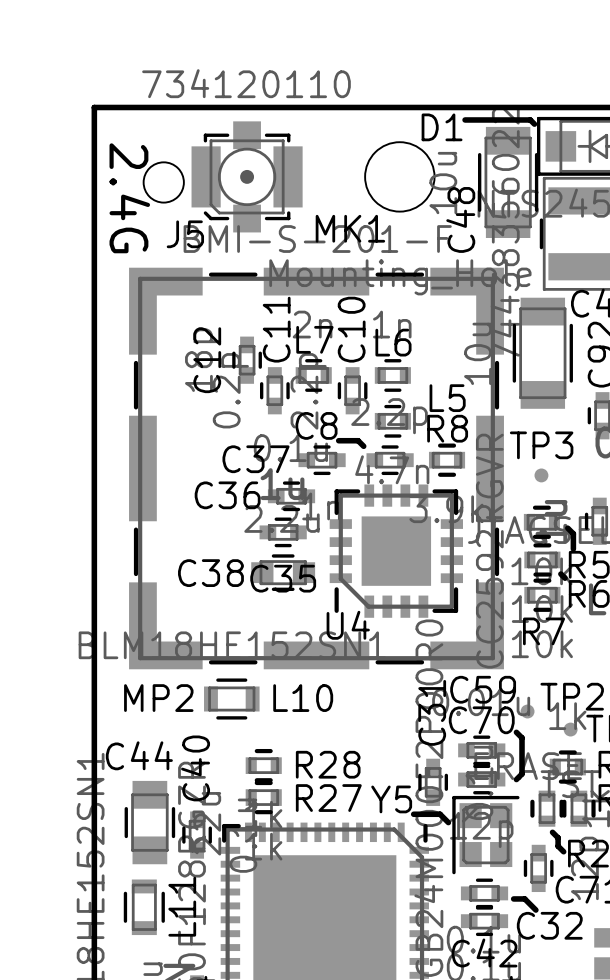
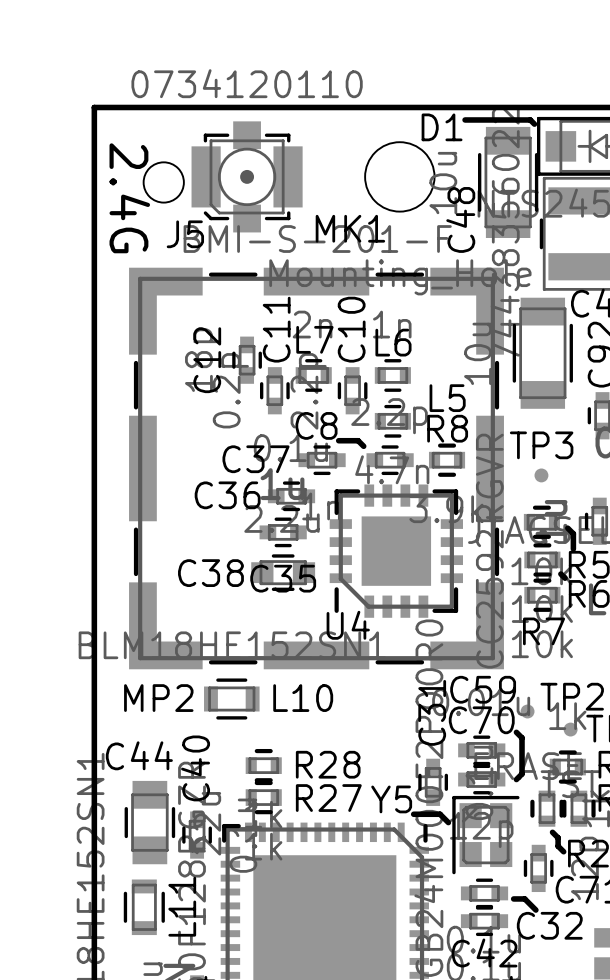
J5 value: 734120110 (246, 83) -> 0734120110 (247, 83)

